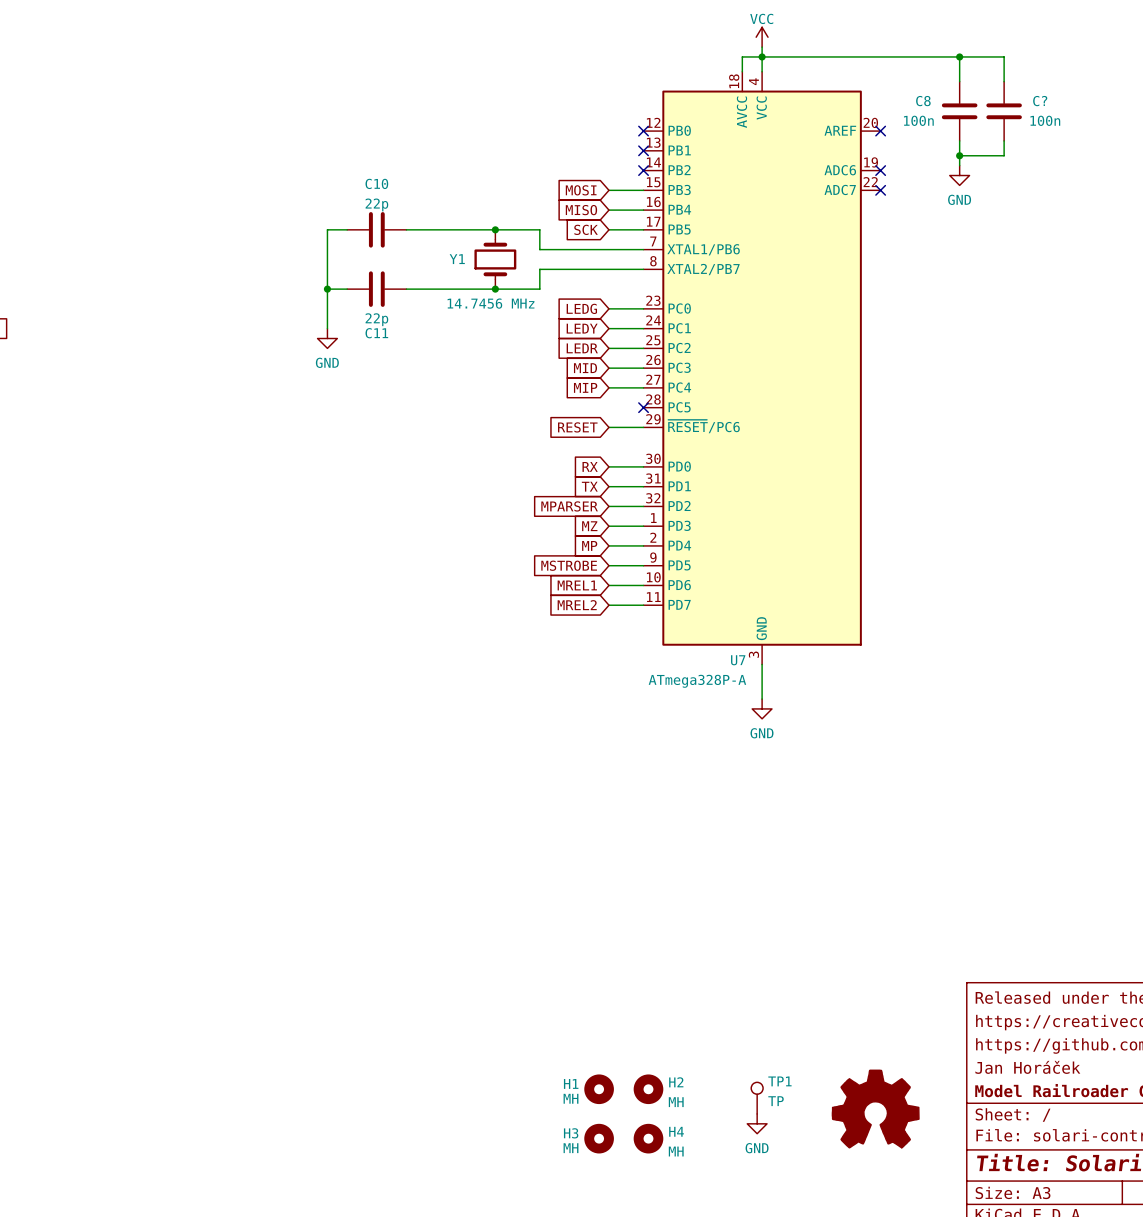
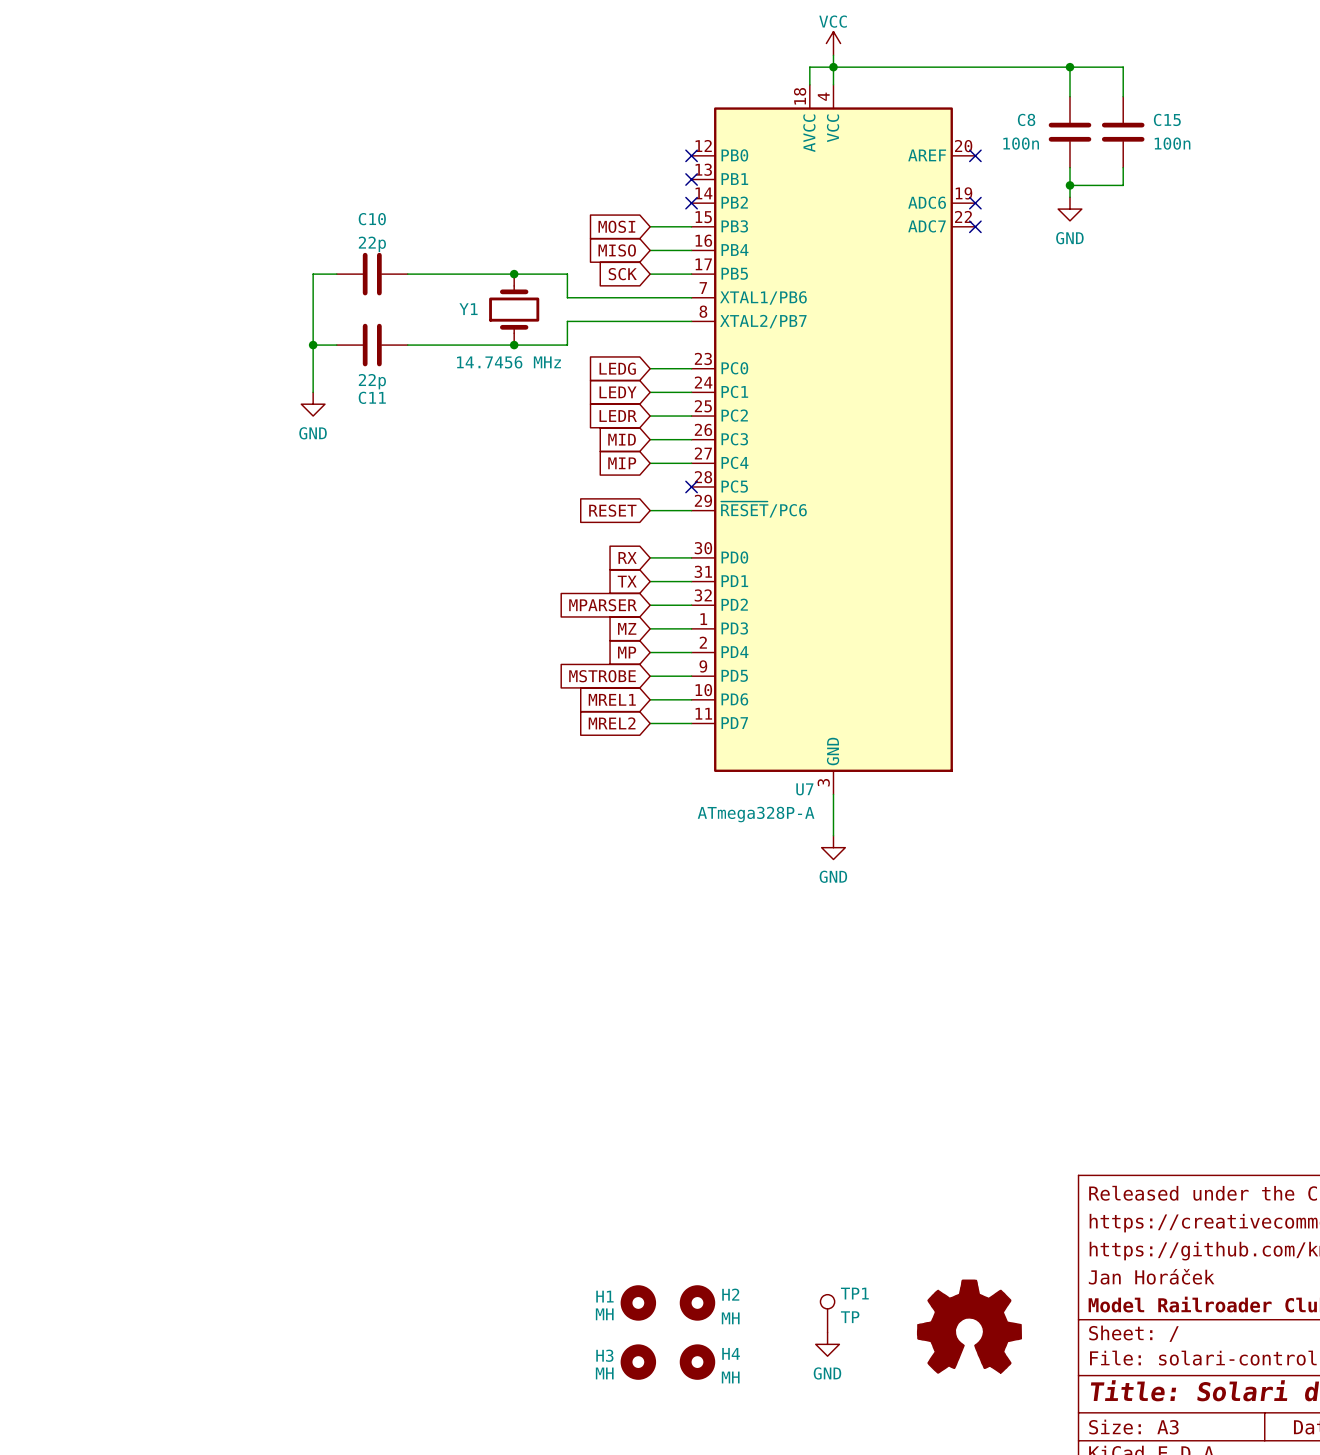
C? name: C? (1040, 101) -> C15 (1167, 119)

